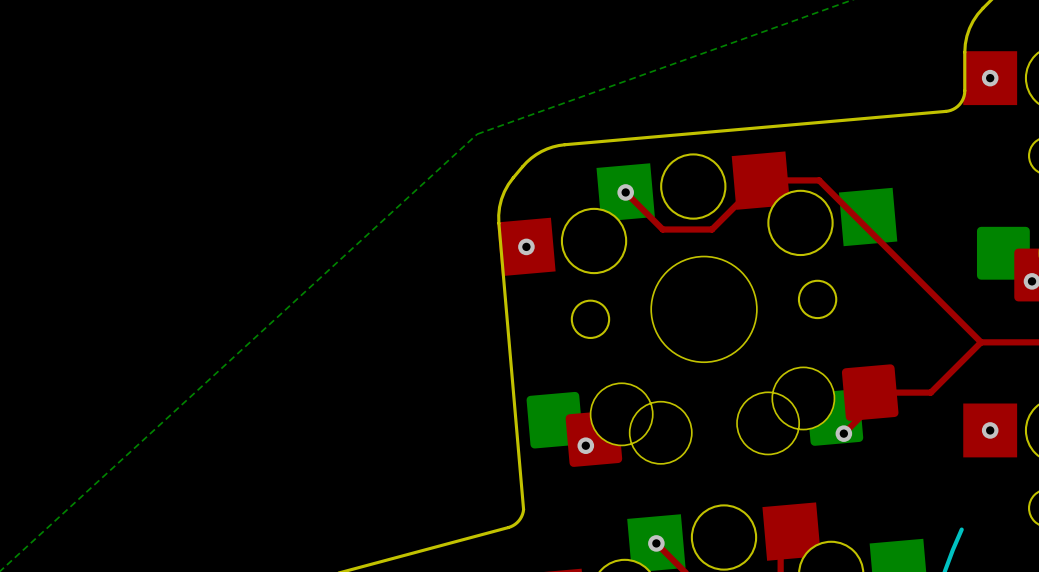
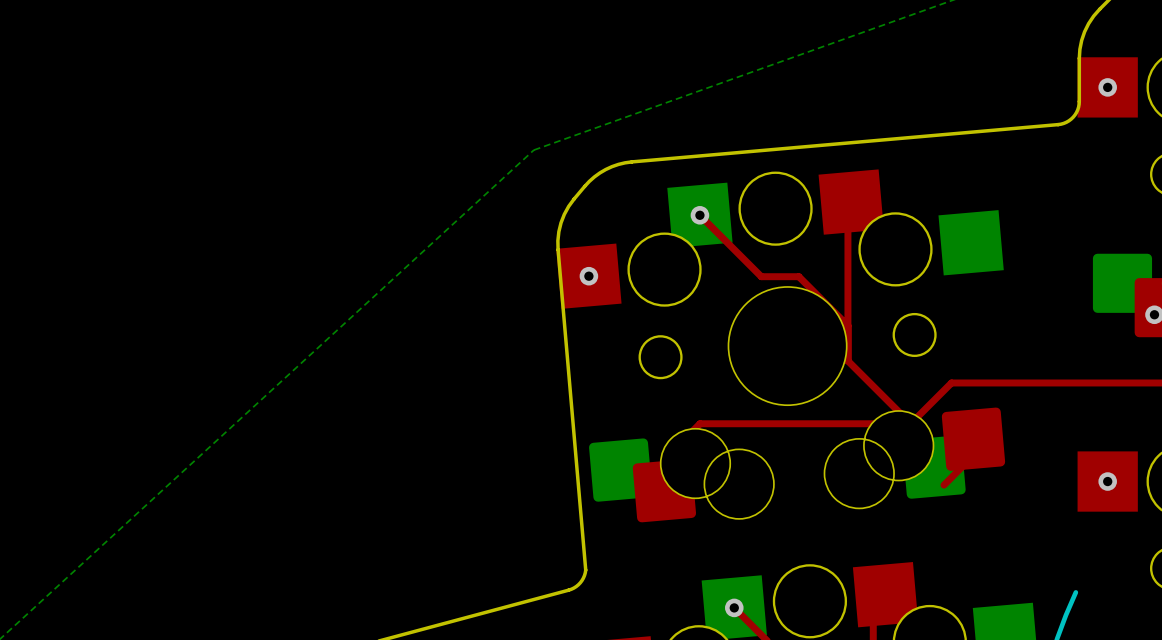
top track: (760, 180) (712, 229) (662, 229) -> (847, 325) (798, 276) (761, 276) (741, 256)
top track: (761, 180) (819, 180) (981, 342) (930, 392) (870, 392) -> none
top track: none -> (847, 205) (847, 360) (910, 423)
top track: none -> (1097, 382) (951, 382) (910, 423)
top track: none -> (910, 423) (700, 423) (679, 443)
via: (843, 433) -> none
via: (585, 445) -> none

